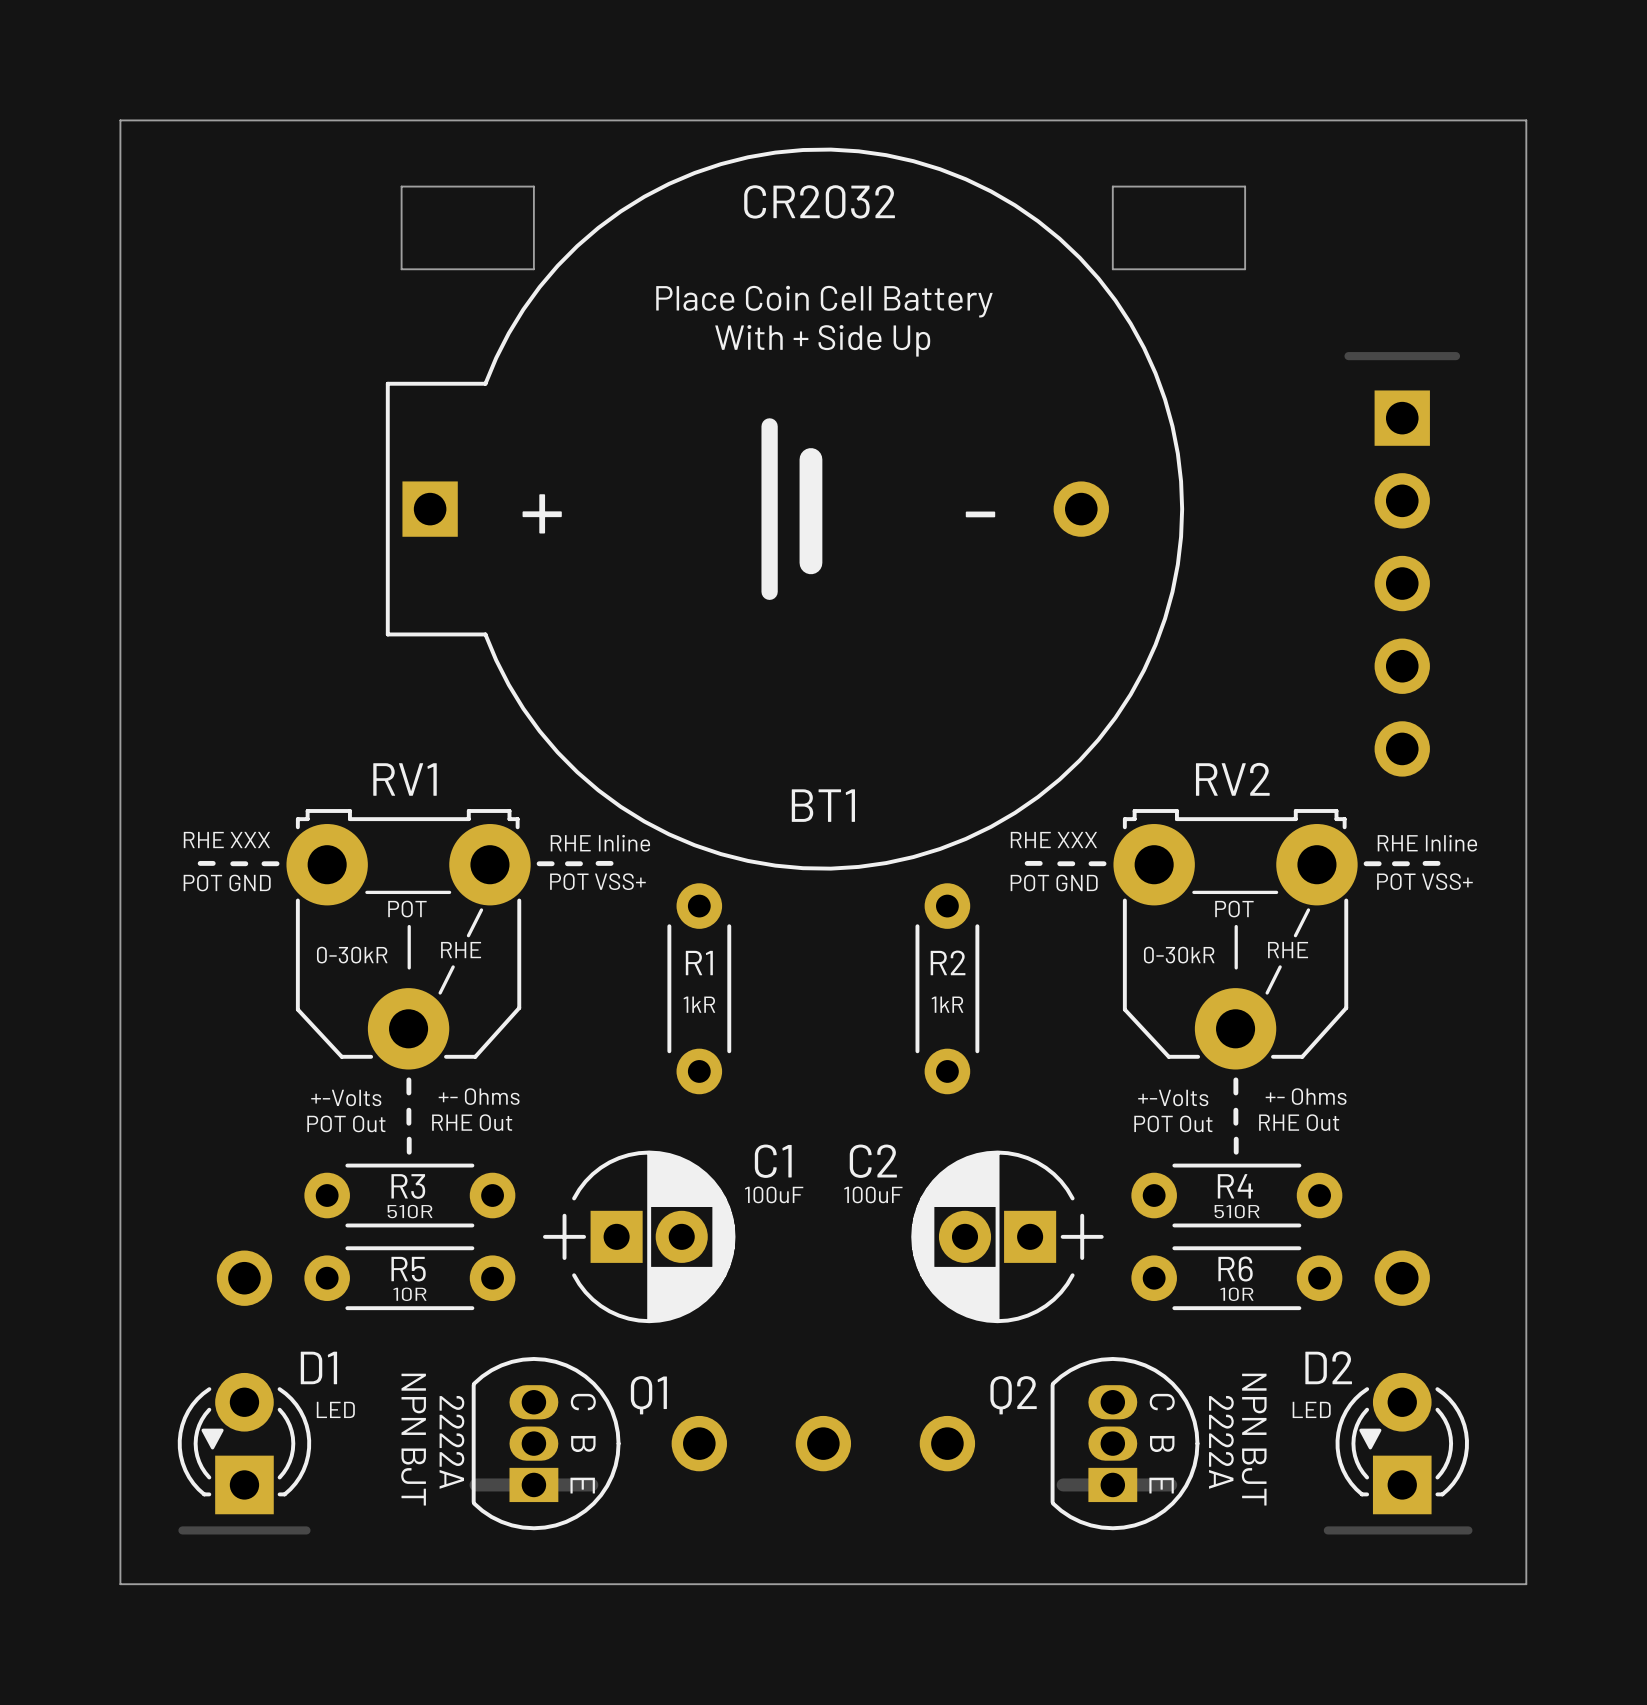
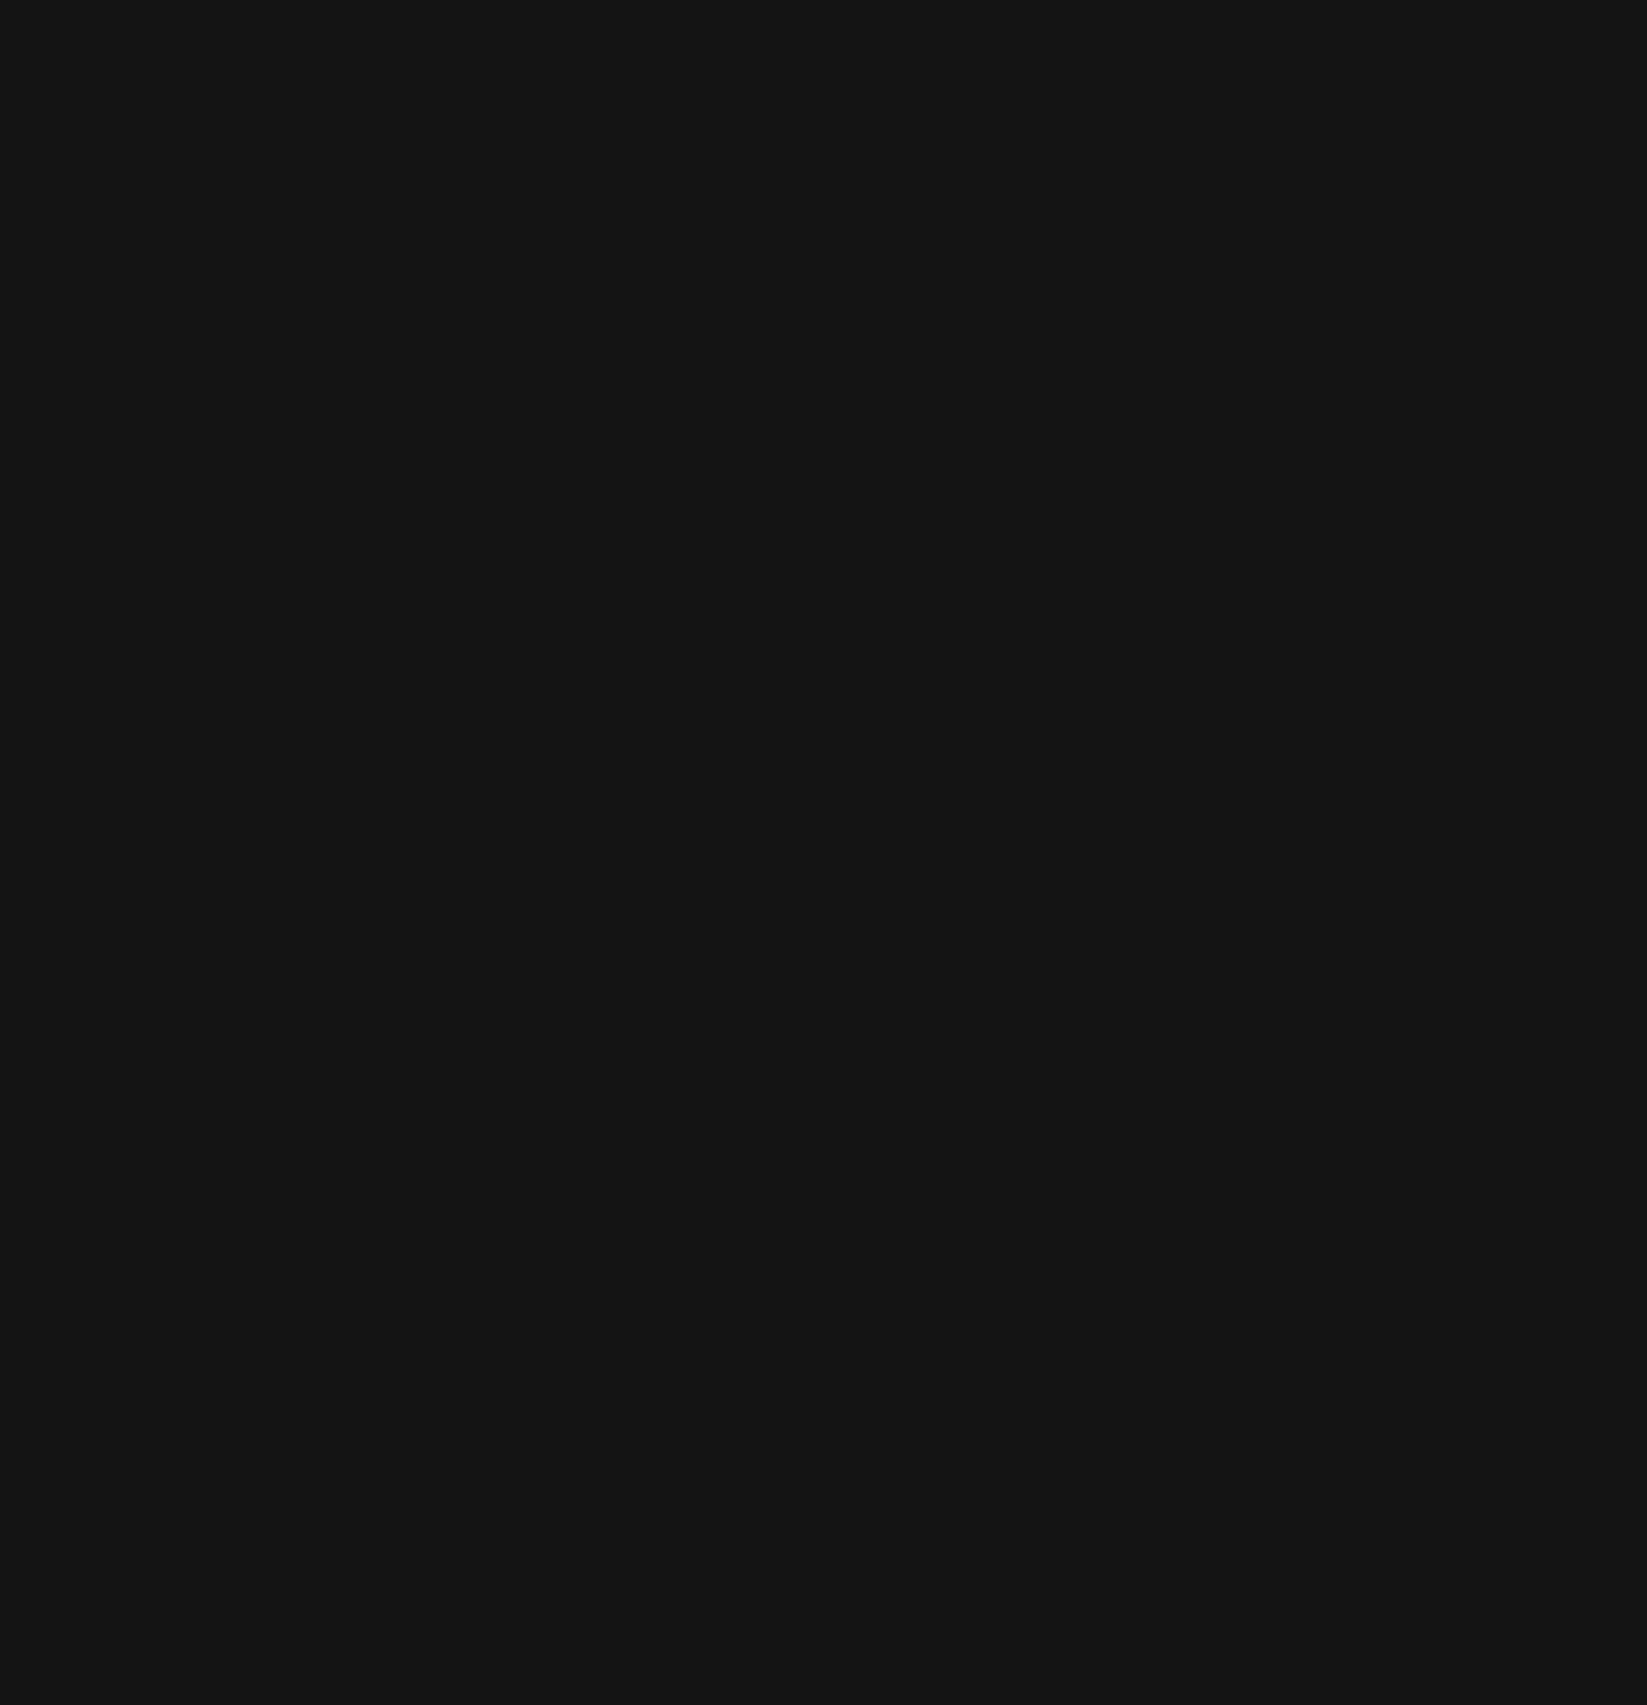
board edge: (1526, 120) (1526, 1584) (120, 1584) (120, 120) (1526, 120) -> none
board edge: (533, 186) (401, 186) (401, 269) (533, 269) (533, 186) -> none
board edge: (1245, 186) (1245, 269) (1112, 269) (1112, 186) (1245, 186) -> none
text: Place Coin Cell Battery (824, 301) -> none
text: With + Side Up (822, 340) -> none
track: (1456, 356) (1348, 356) -> none
BT1: (784, 509) -> none
part: (1402, 583) -> none
text: 0-30kR (352, 955) -> none
text: 0-30kR (1179, 955) -> none
RV1: (405, 981) -> none
RV2: (1232, 981) -> none
R1: (699, 988) -> none
R2: (947, 988) -> none
text: 1kR (699, 1004) -> none
text: 1kR (947, 1004) -> none
text: 100uF (774, 1194) -> none
text: 100uF (873, 1194) -> none
R3: (409, 1195) -> none
R4: (1236, 1195) -> none
text: 510R (410, 1211) -> none
text: 510R (1237, 1211) -> none
C1: (639, 1236) -> none
C2: (1007, 1236) -> none
part: (244, 1278) -> none
R5: (409, 1278) -> none
R6: (1236, 1278) -> none
part: (1402, 1278) -> none
text: 10R (409, 1294) -> none
text: 10R (1236, 1294) -> none
text: LED (335, 1409) -> none
text: LED (1311, 1409) -> none
D1: (244, 1443) -> none
Q1: (546, 1443) -> none
part: (699, 1443) -> none
part: (823, 1443) -> none
part: (947, 1443) -> none
Q2: (1125, 1443) -> none
D2: (1402, 1443) -> none
track: (591, 1484) (476, 1484) -> none
track: (1170, 1484) (1063, 1484) -> none
track: (306, 1530) (182, 1530) -> none
track: (1468, 1530) (1327, 1530) -> none

